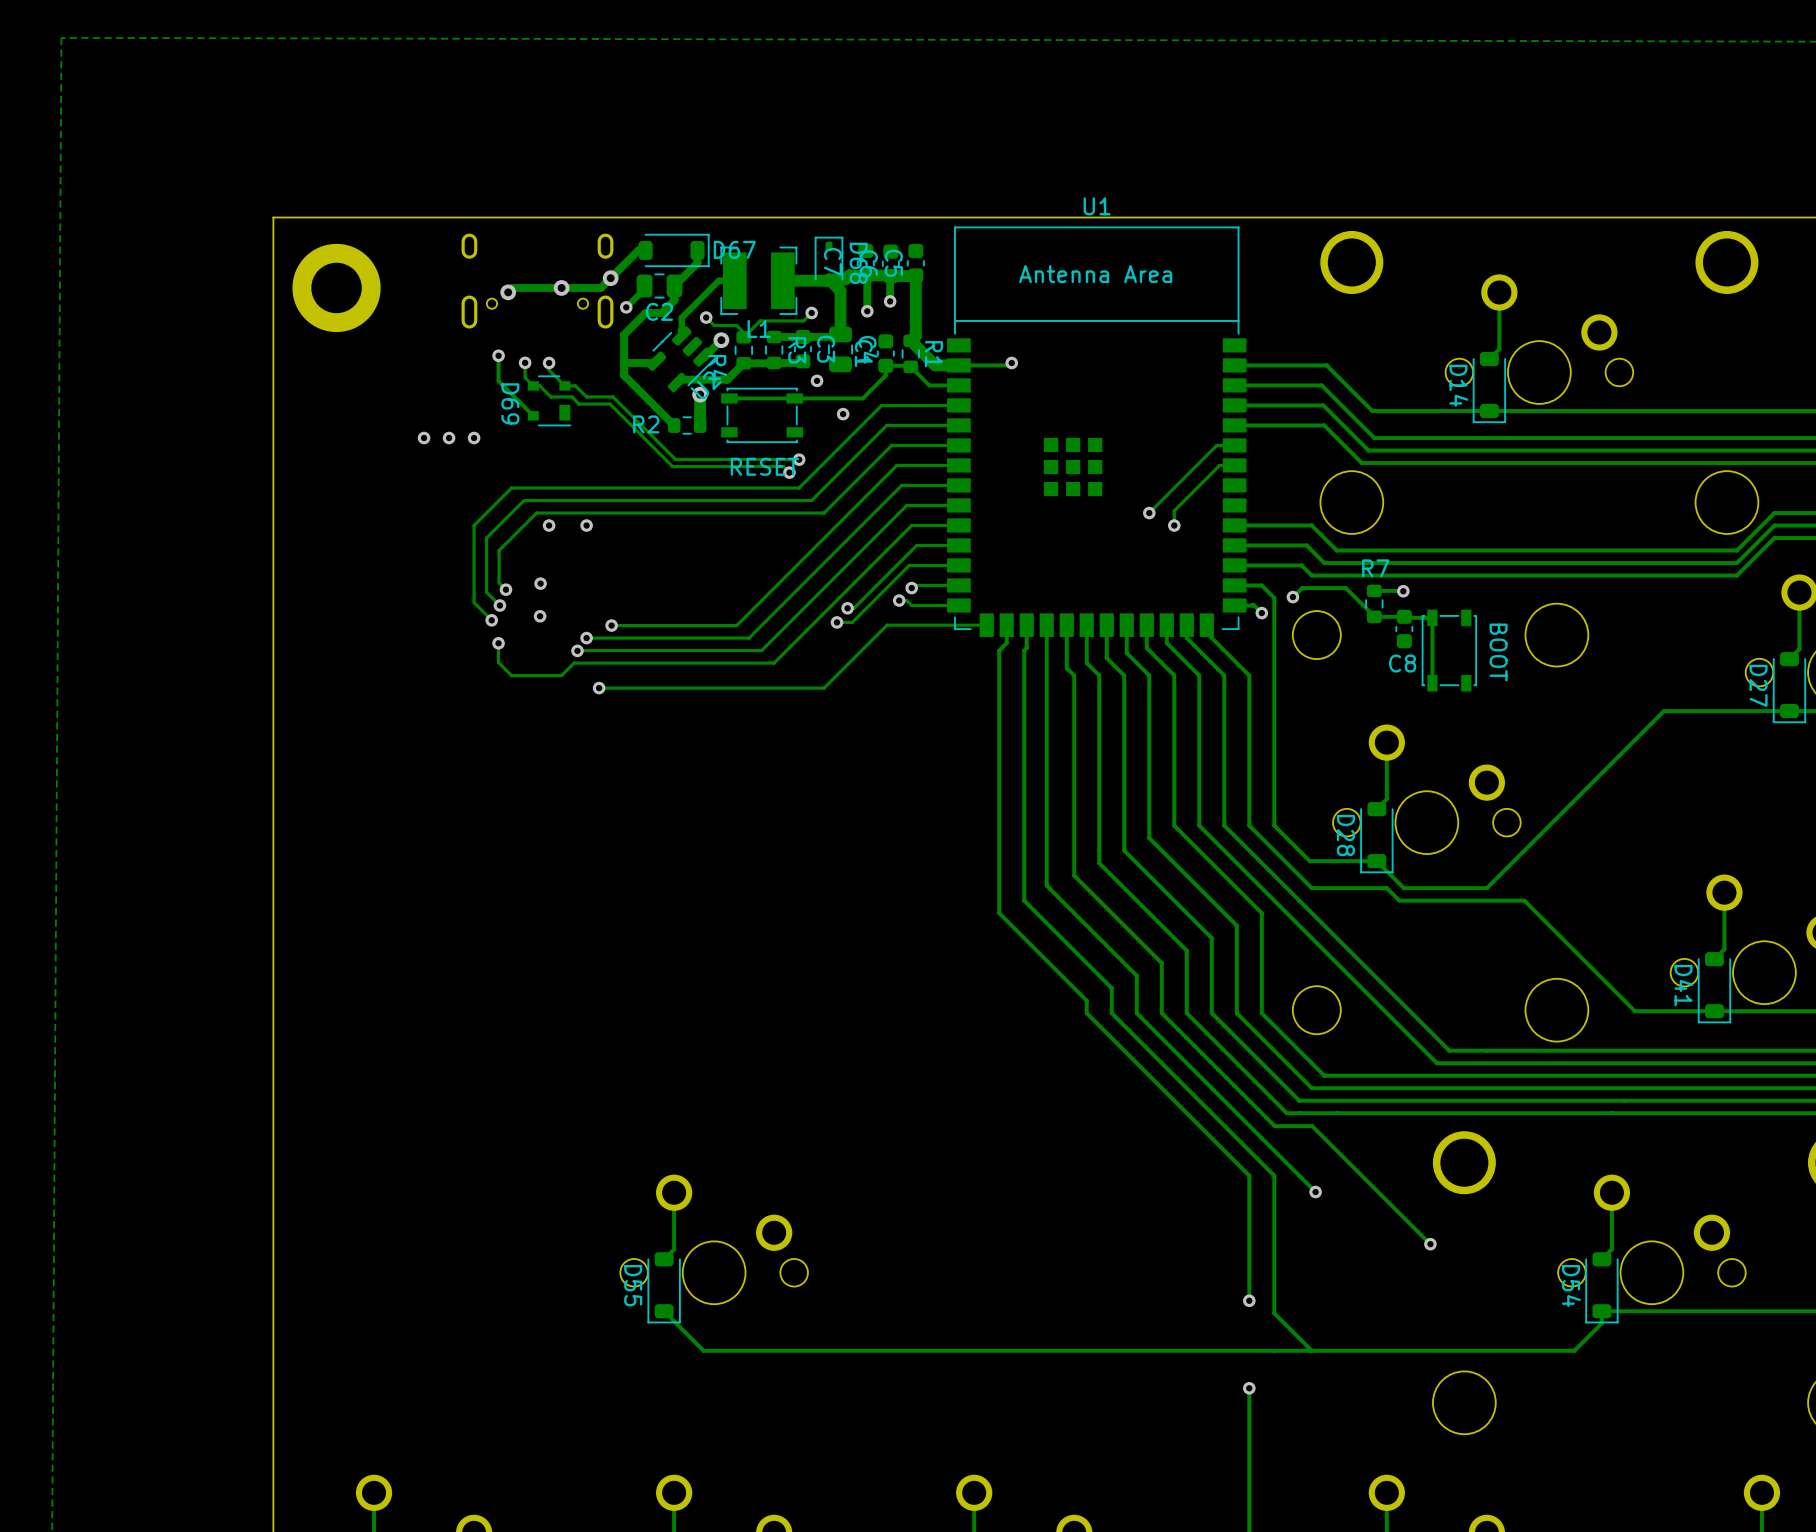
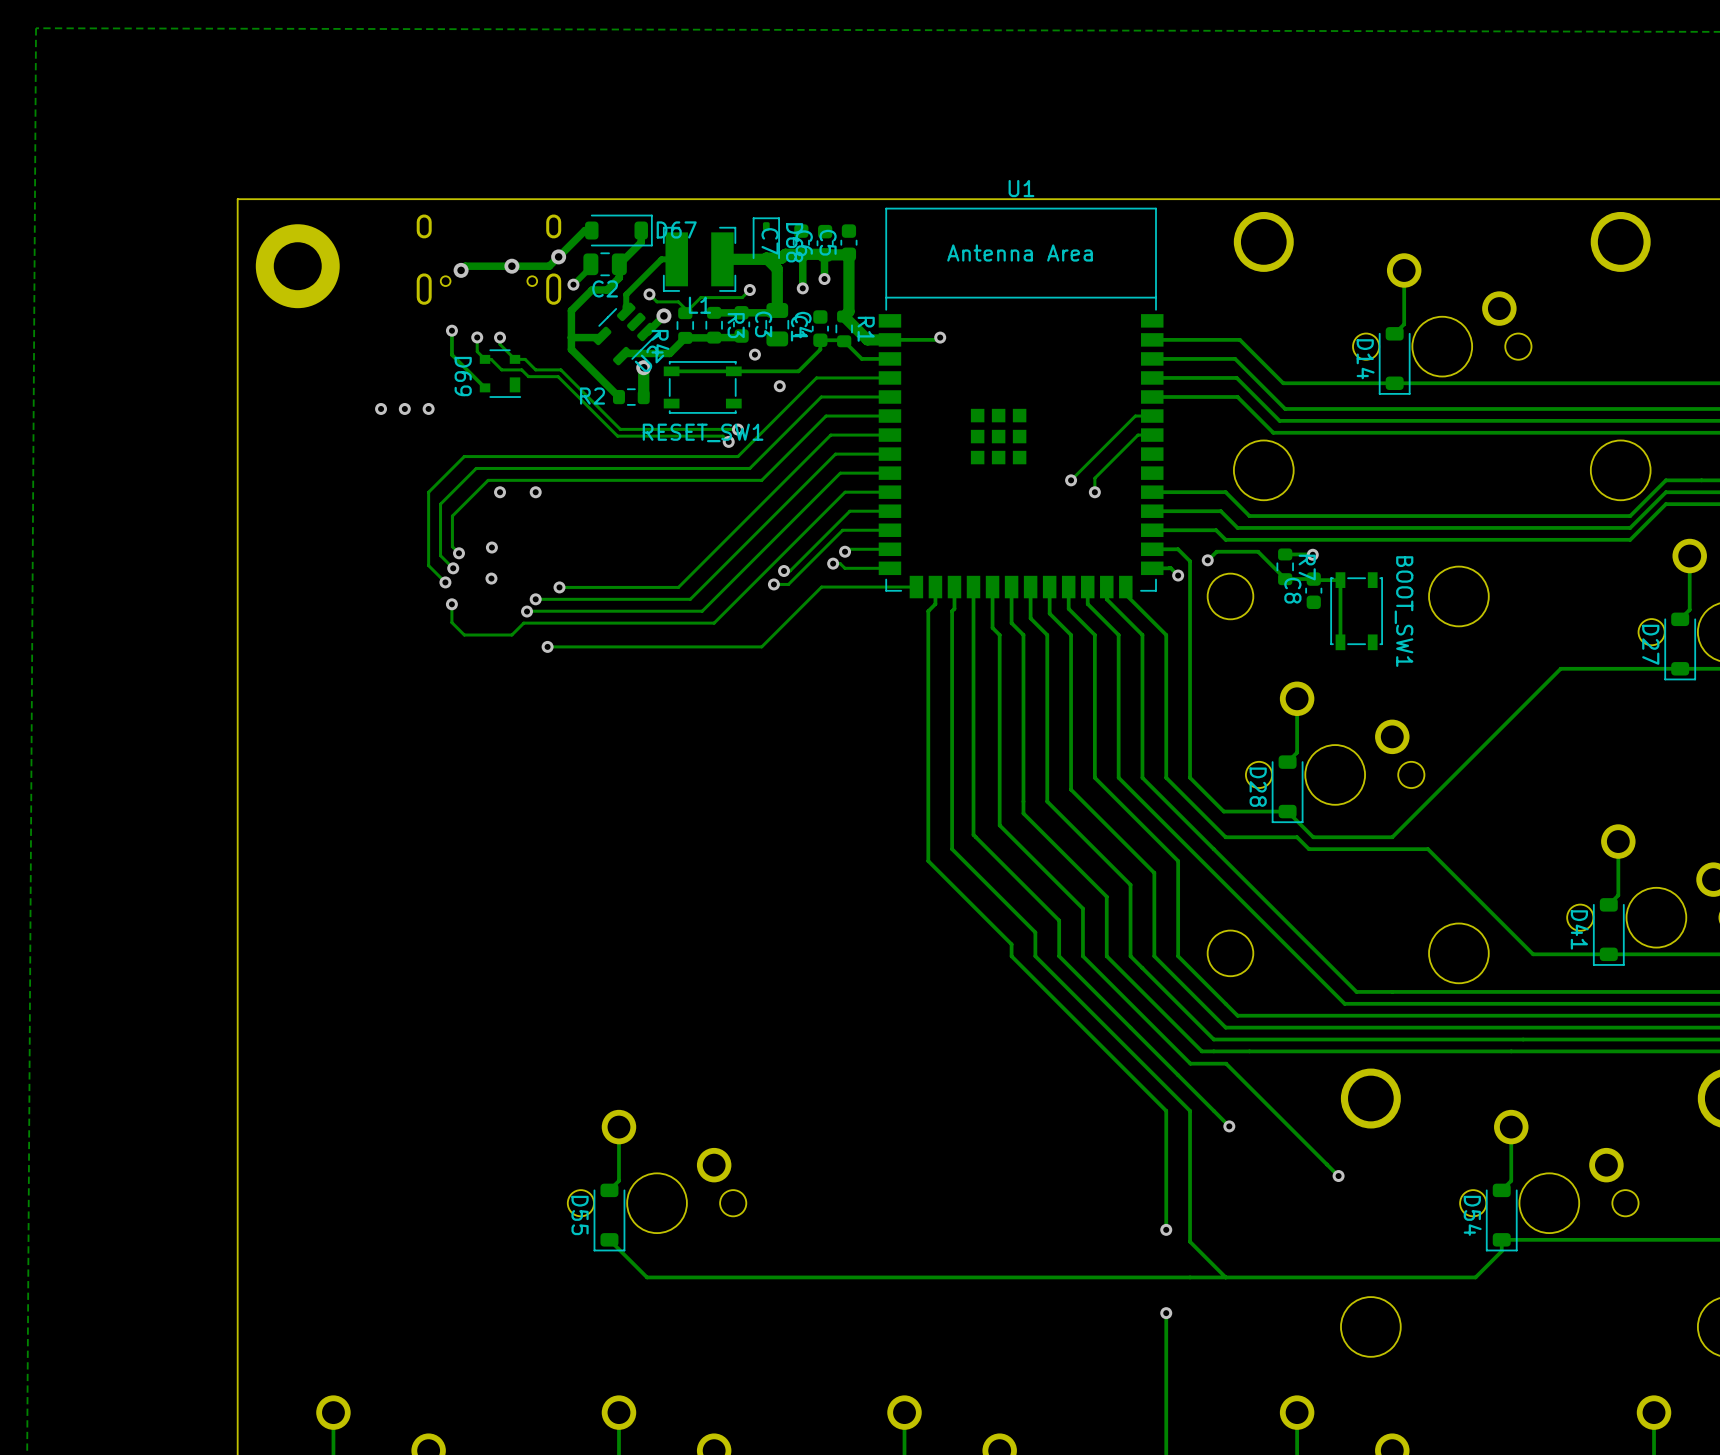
RESET name: RESET (764, 466) -> RESET_SW1 (703, 432)
R7 name rotation: 0° (1375, 568) -> 90° clockwise (1307, 567)
R7 name position: R7 (1375, 568) -> R7 (1307, 567)
BOOT name: BOOT (1498, 652) -> BOOT_SW1 (1404, 611)
C8 name rotation: 0° (1402, 663) -> 90° clockwise (1292, 590)
C8 name position: C8 (1402, 663) -> C8 (1292, 590)

